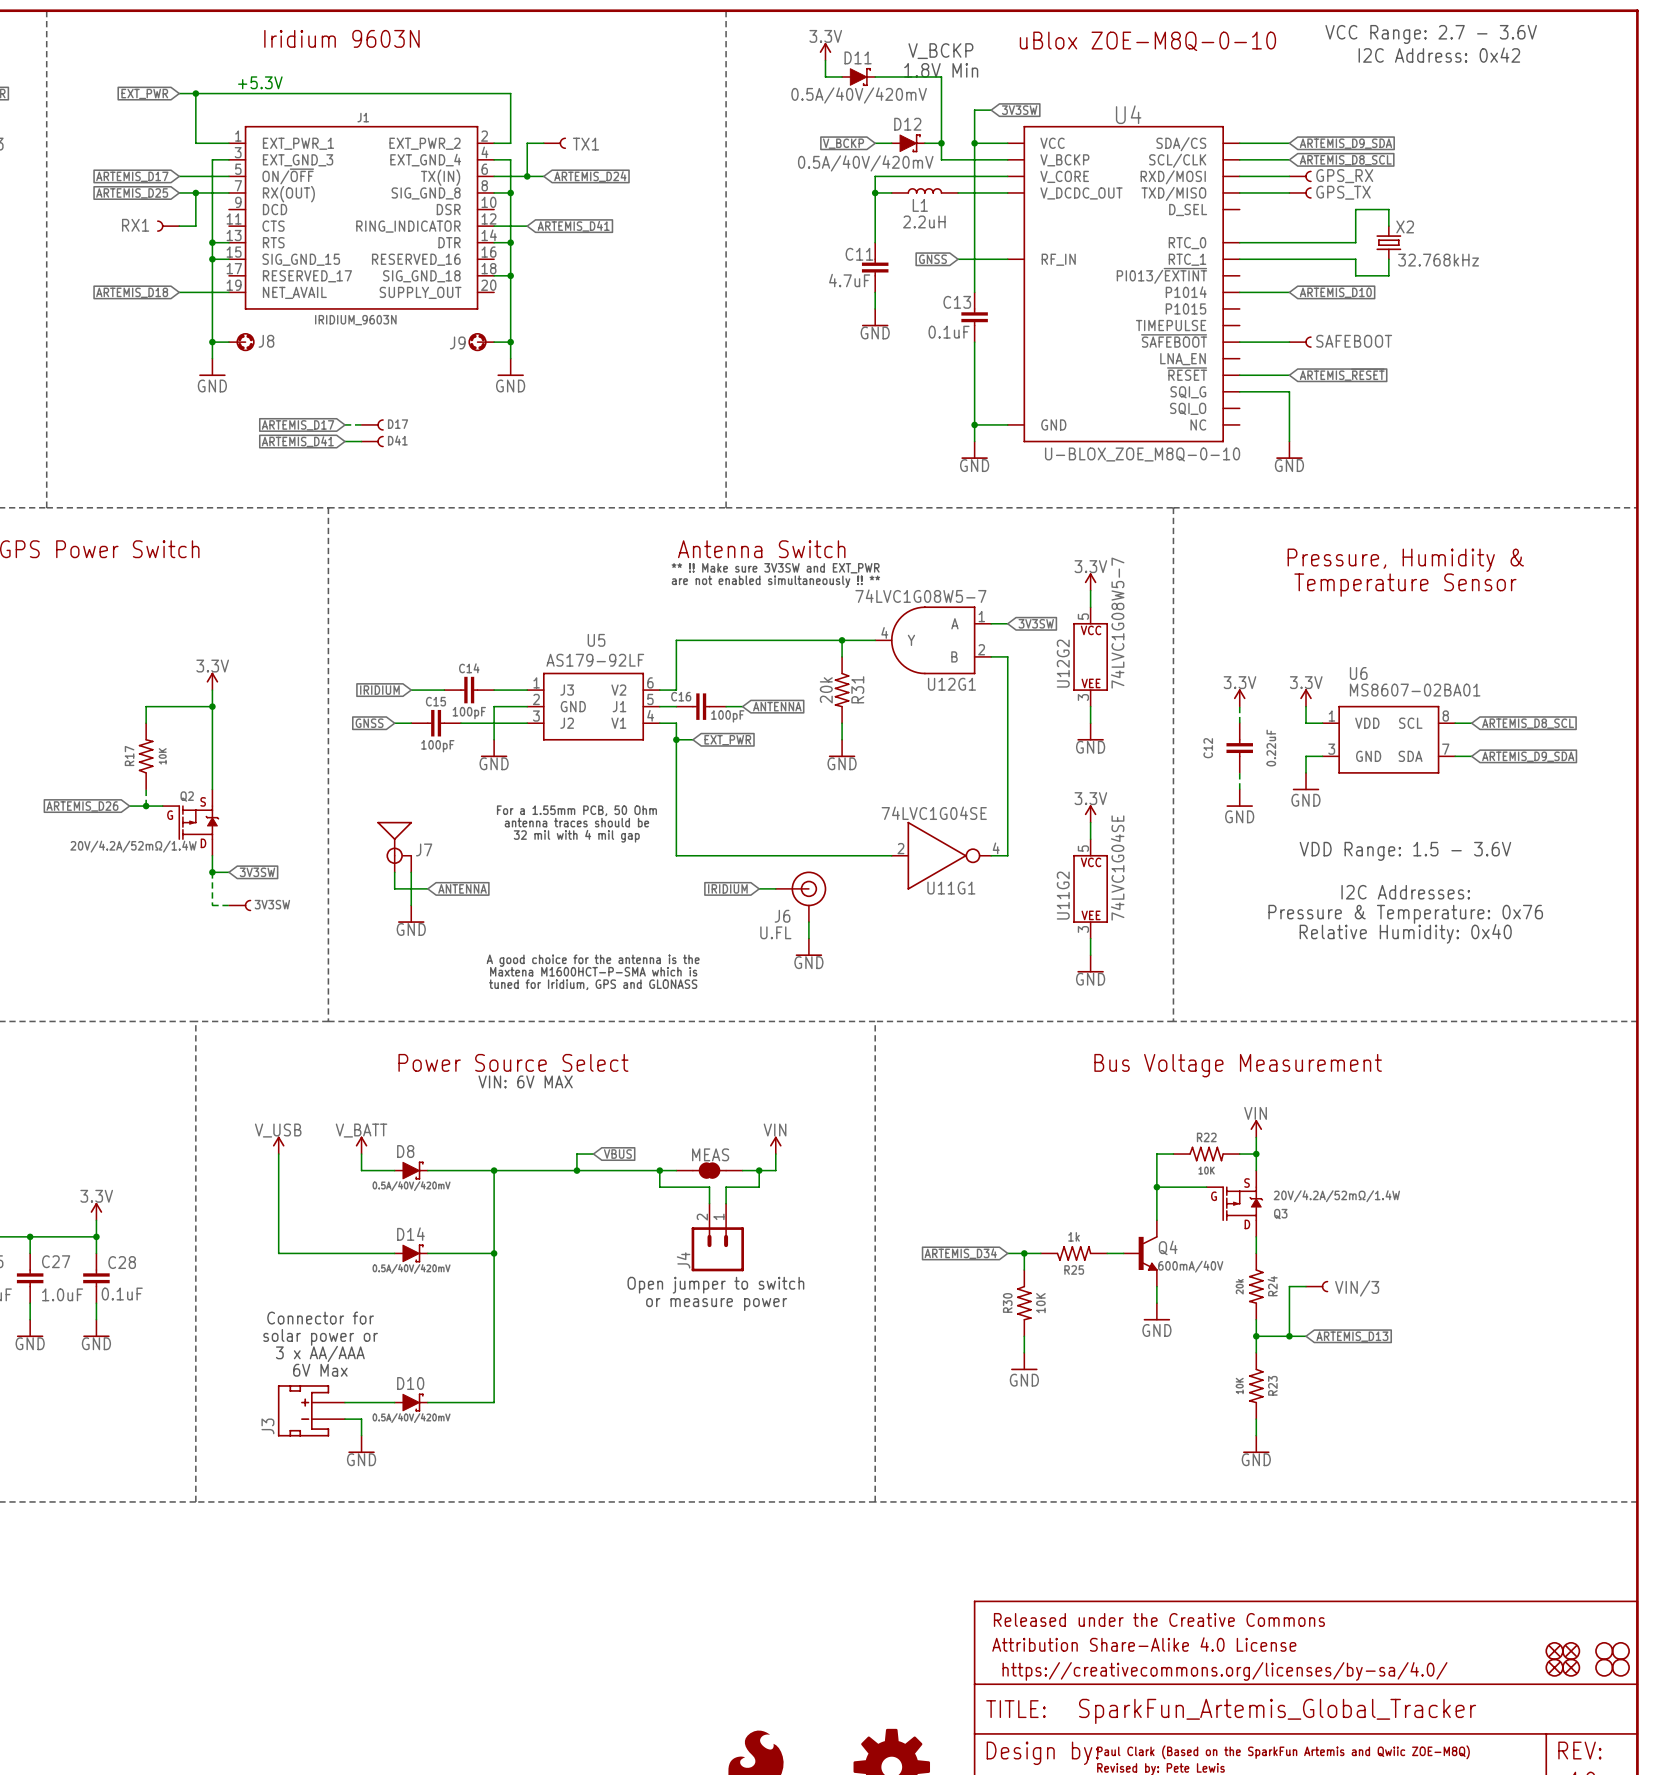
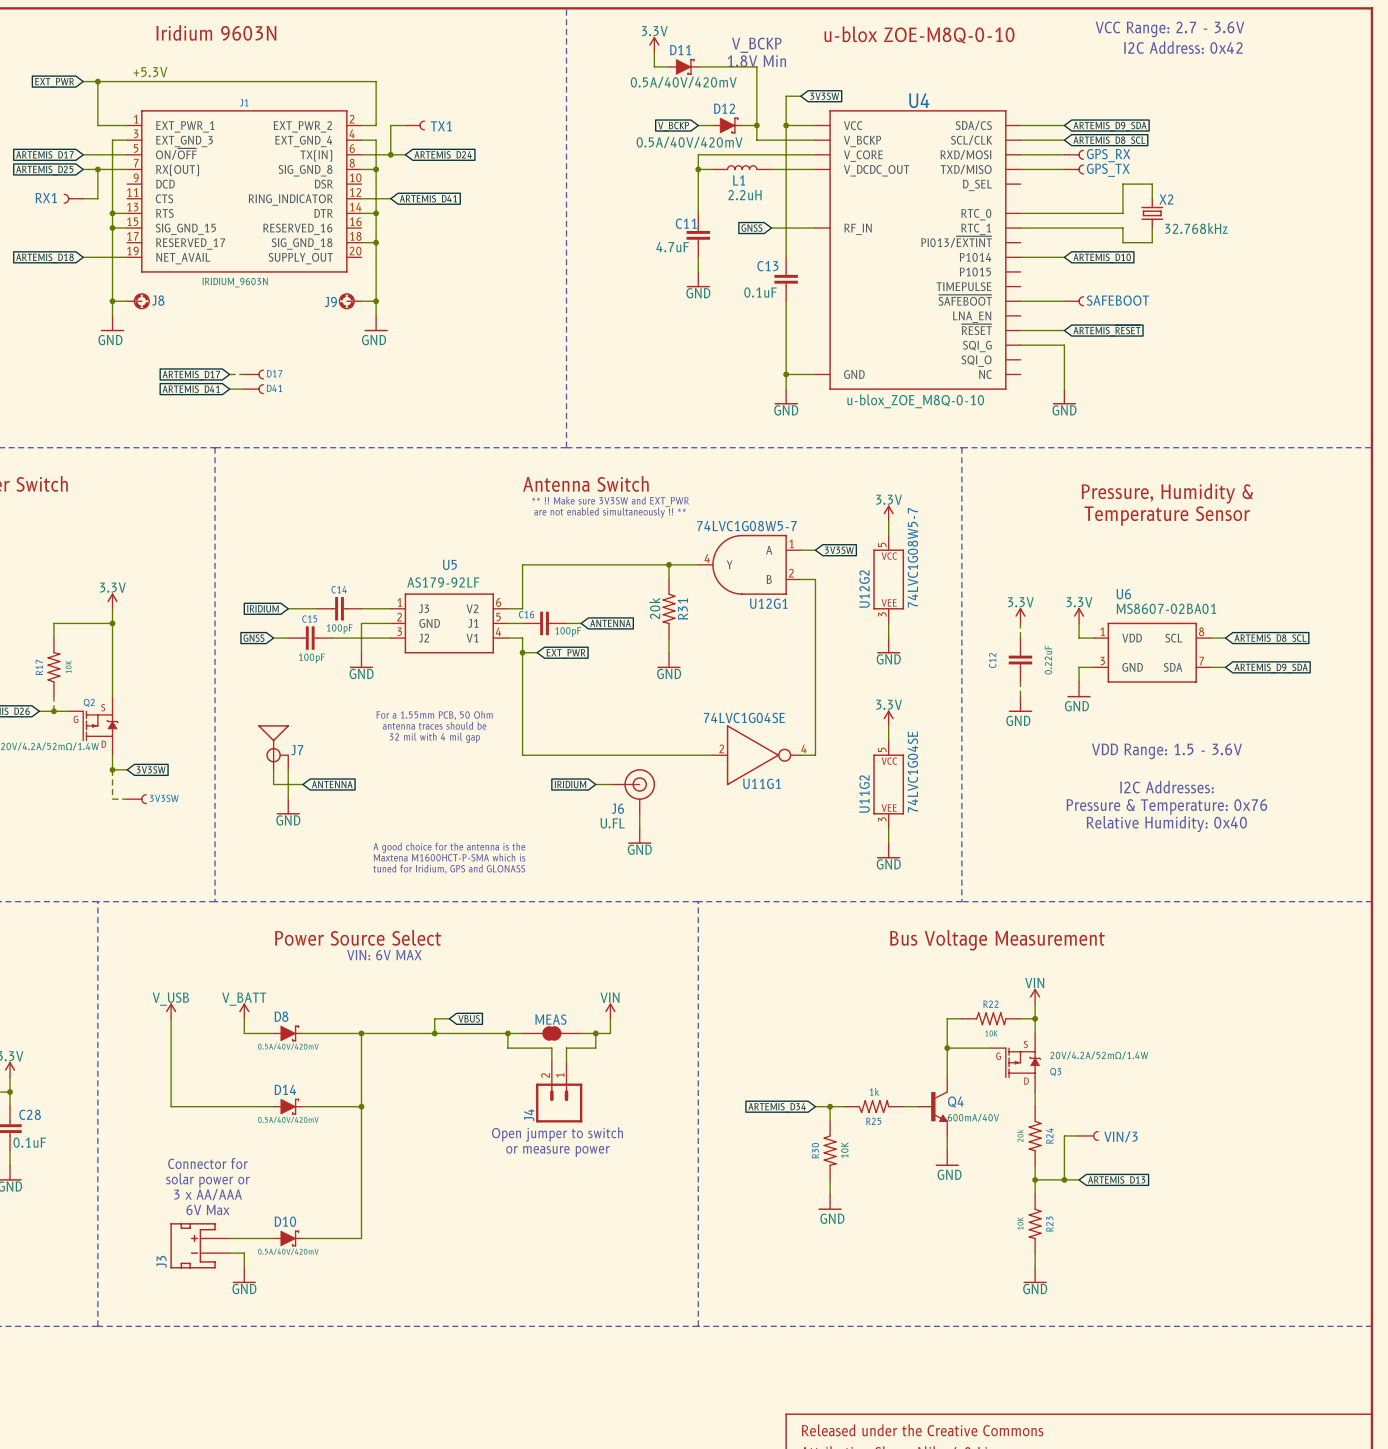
text: uBlox ZOE-M8Q-0-10 (1147, 41) -> u-blox ZOE-M8Q-0-10 (919, 34)
U4 value: U-BLOX_ZOE_M8Q-0-10 (1142, 454) -> u-blox_ZOE_M8Q-0-10 (915, 401)

